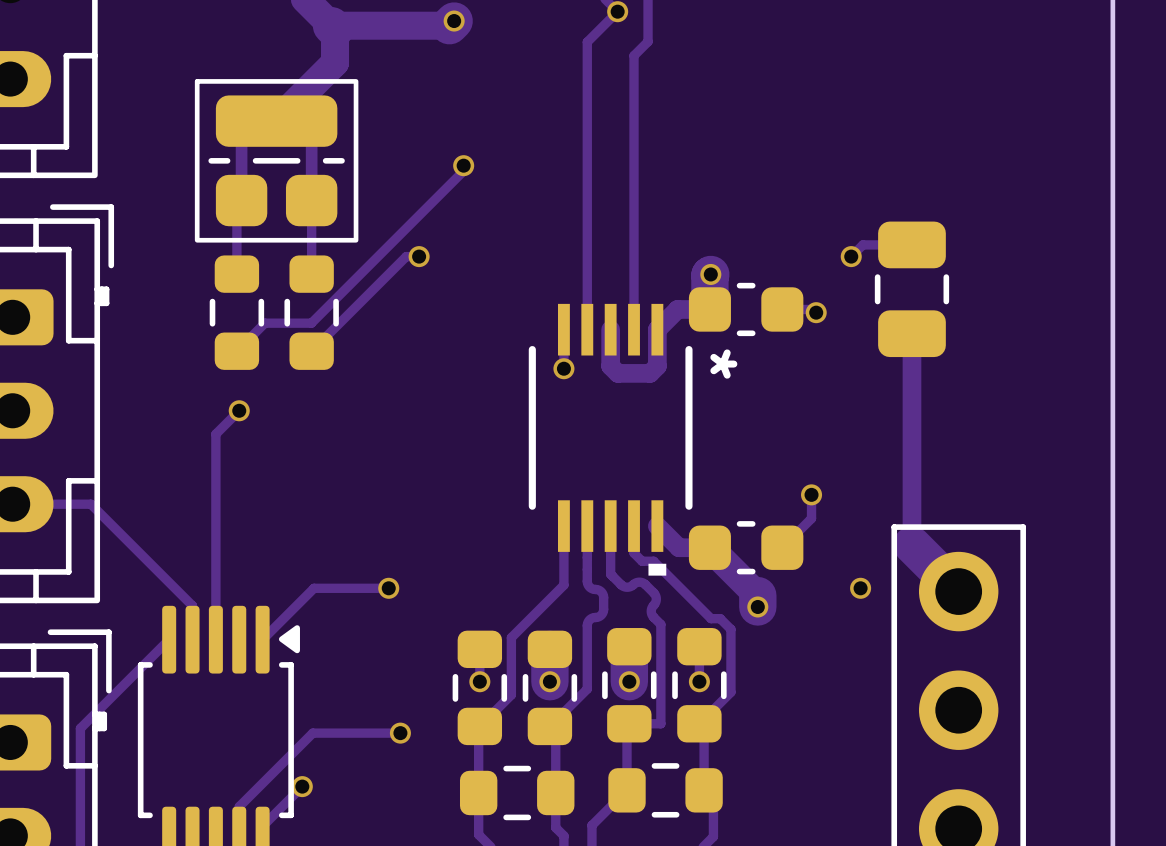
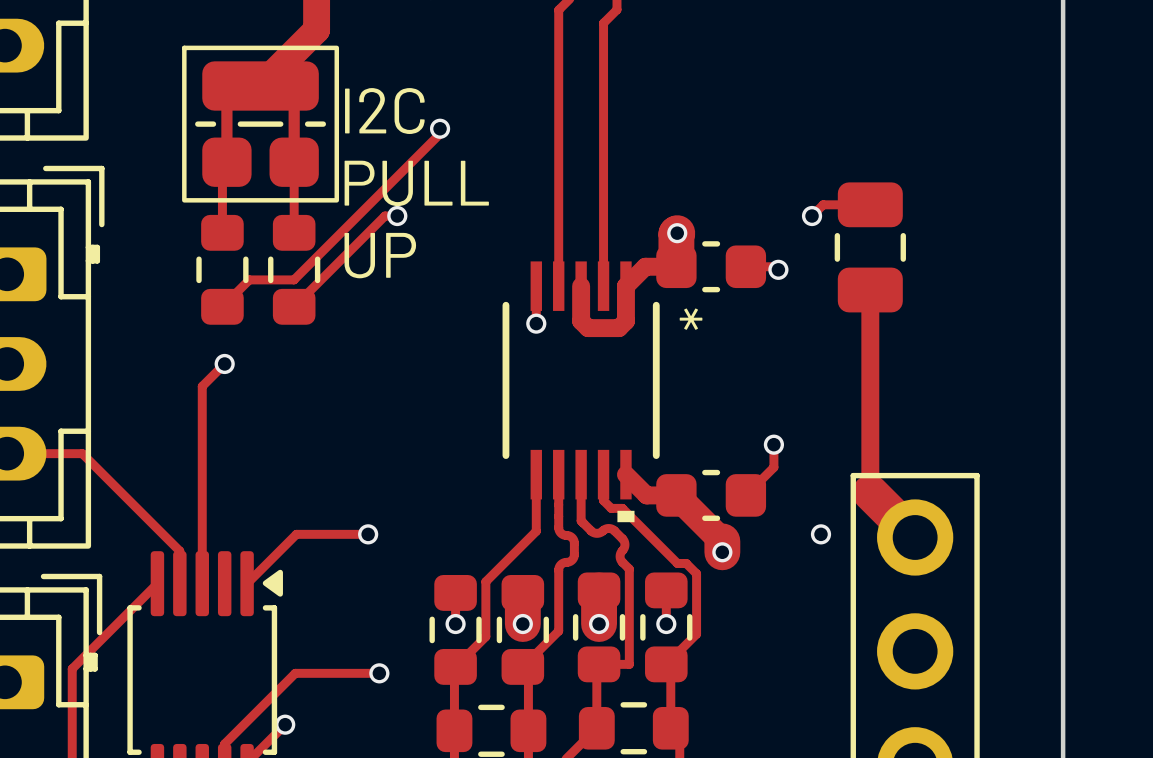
text: none -> I2C (384, 111)
text: none -> PULL (416, 183)
text: none -> UP (380, 255)

